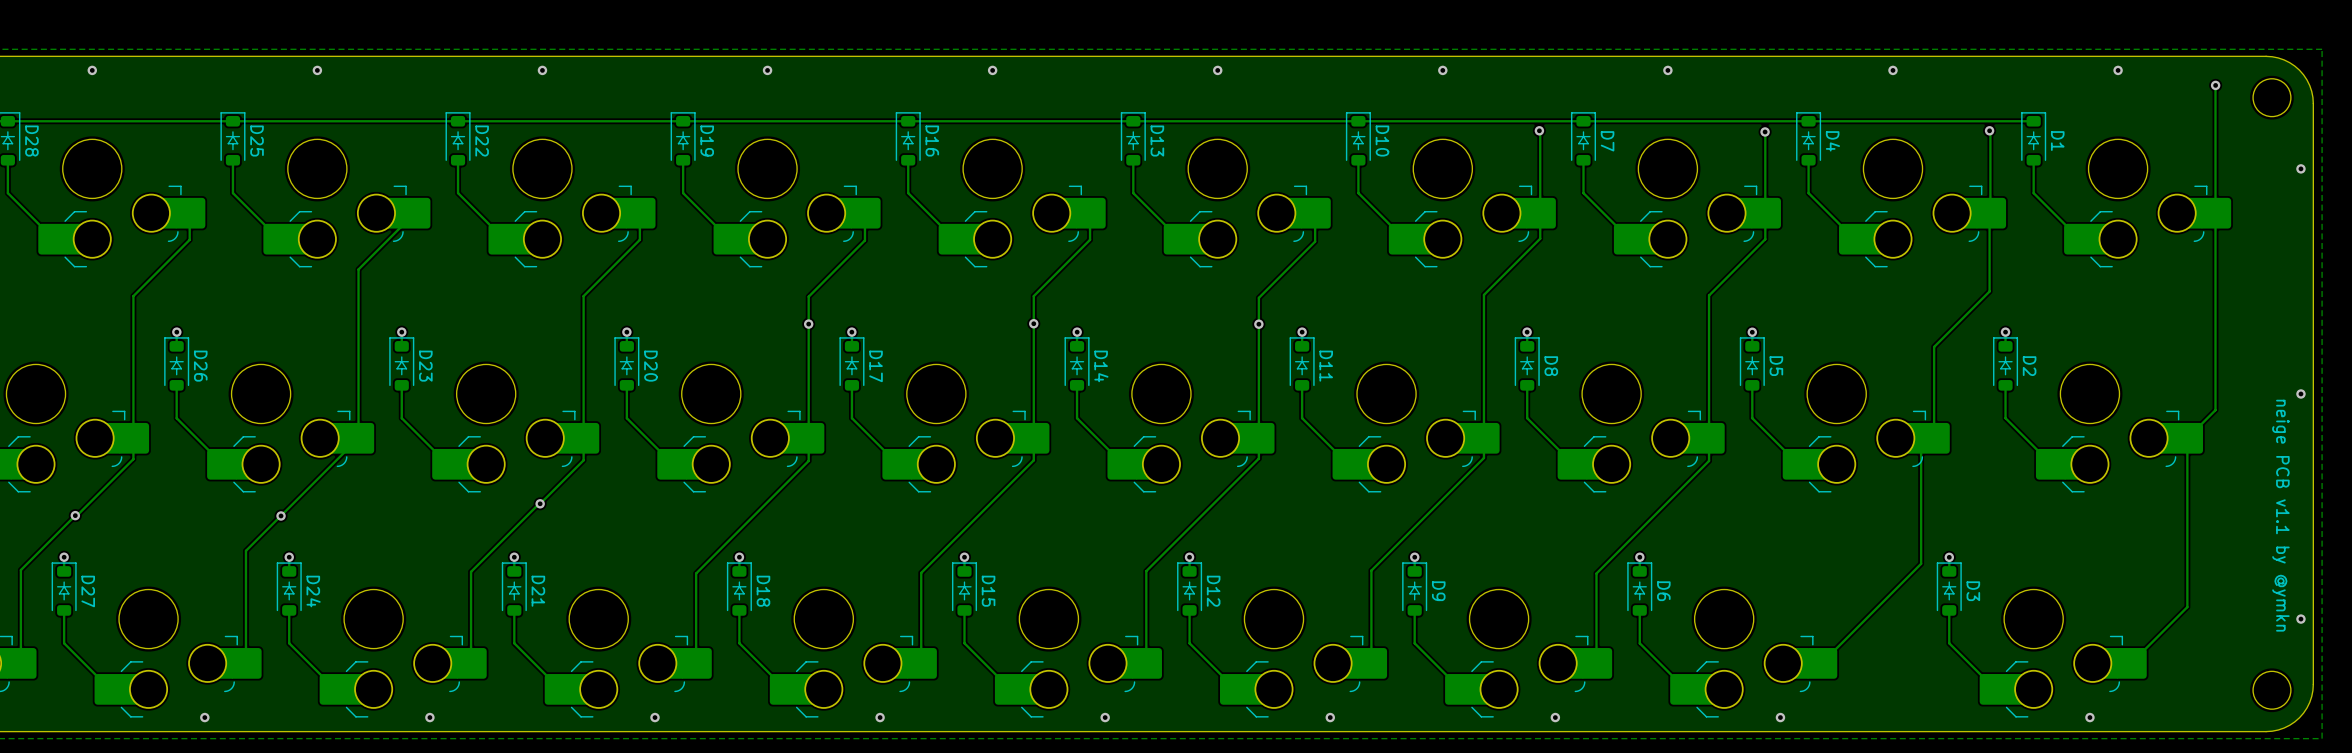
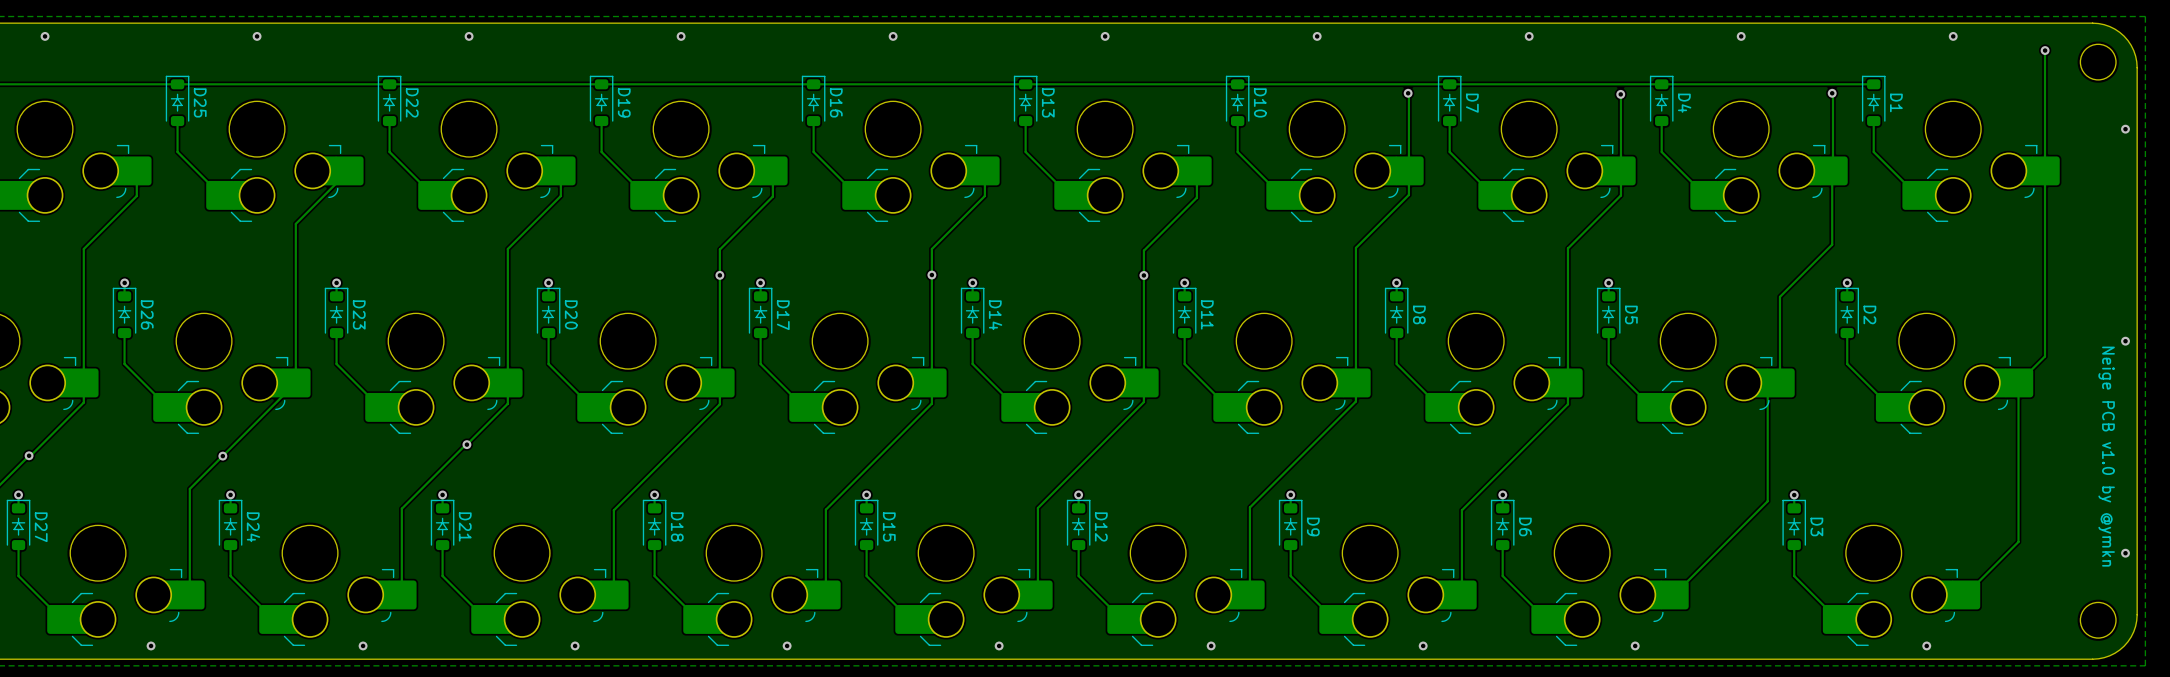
text: neige PCB v1.1 by @ymkn (2280, 515) -> Neige PCB v1.0 by @ymkn (2106, 456)

